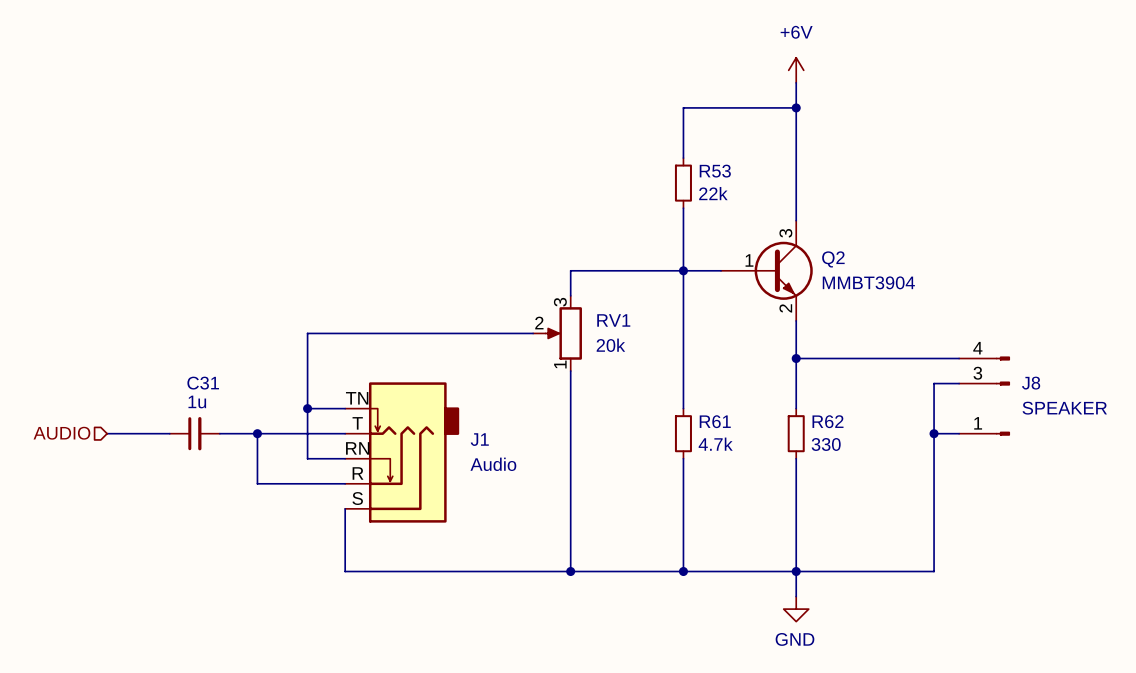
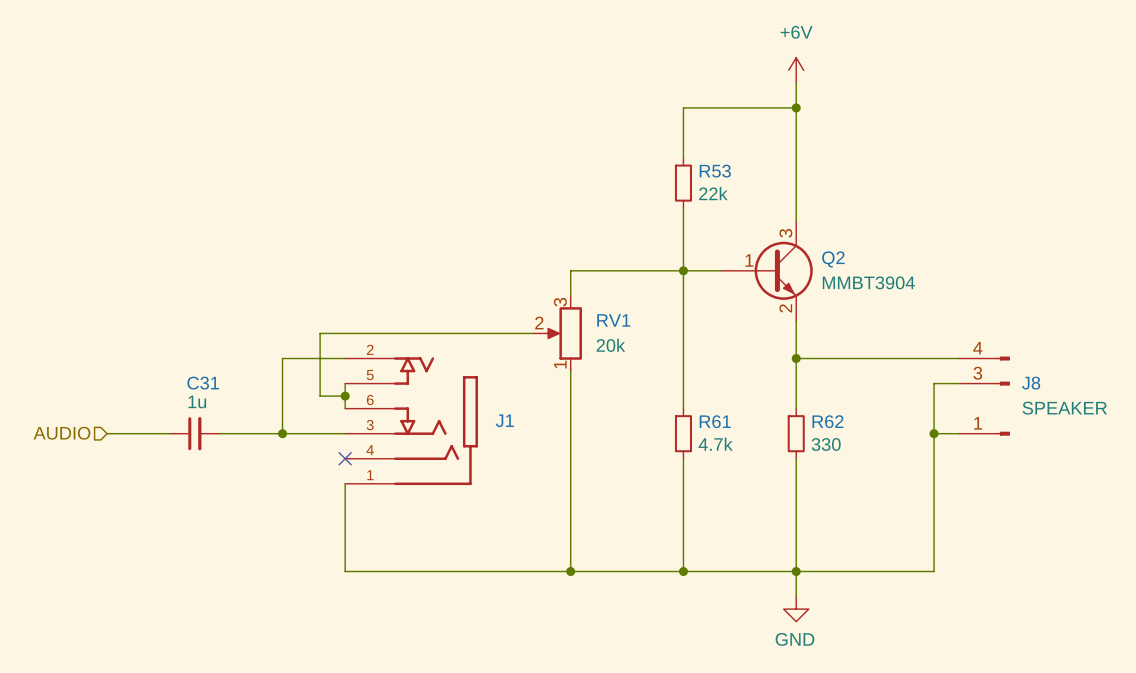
wire: (320, 333) (307, 333) (307, 458) (345, 458) -> (320, 333) (320, 396) (345, 396)
wire: none -> (345, 358) (282, 358) (282, 433)
J1 symbol: [345, 382, 460, 523] -> [345, 357, 478, 486]
junction: none -> (345, 396)
wire: (307, 408) (345, 408) -> (345, 383) (345, 408)
junction: (307, 408) -> none
wire: (257, 433) (257, 483) (345, 483) -> (345, 508) (345, 483)
junction: (257, 433) -> none
junction: none -> (282, 433)
J1 name position: J1 (479, 439) -> J1 (504, 420)
no-connect mark: none -> (345, 458)
J1 value: Audio (493, 464) -> none

